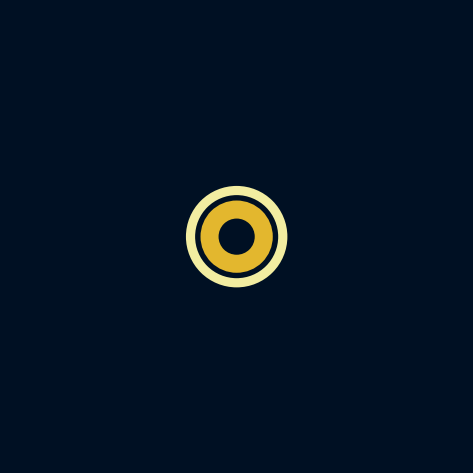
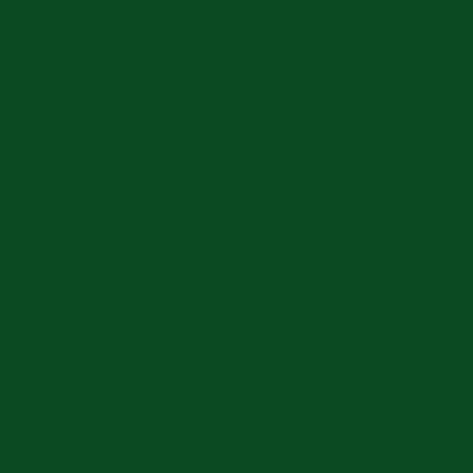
part: (236, 236) -> none

